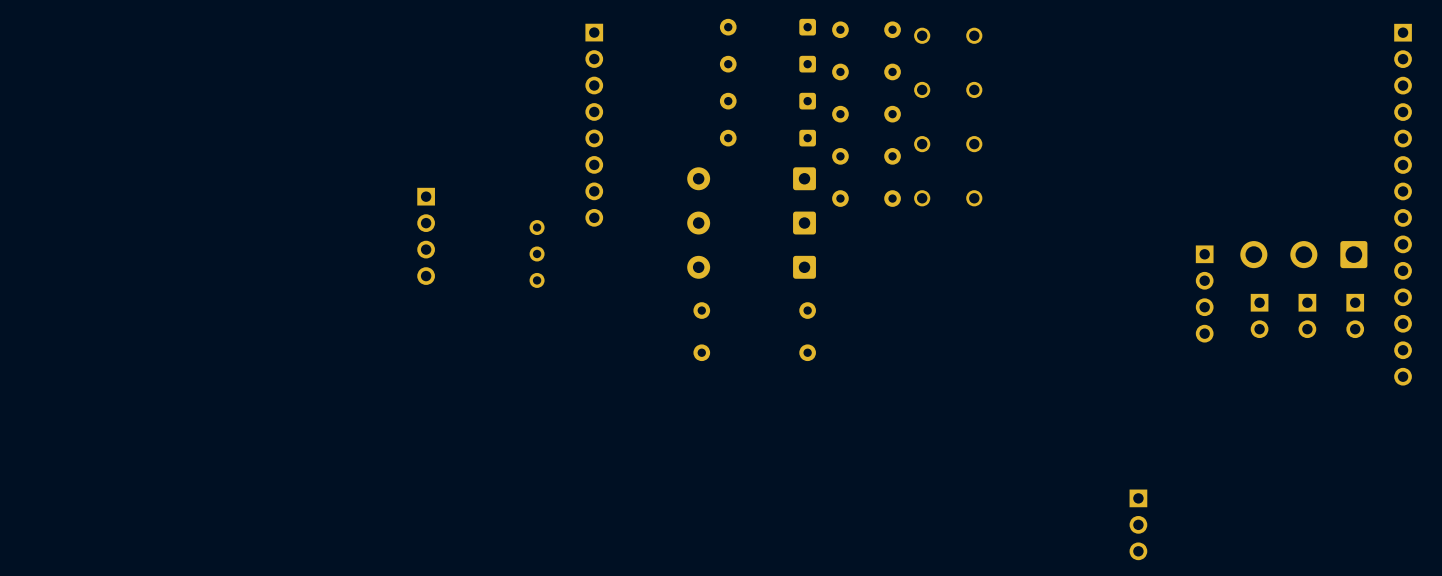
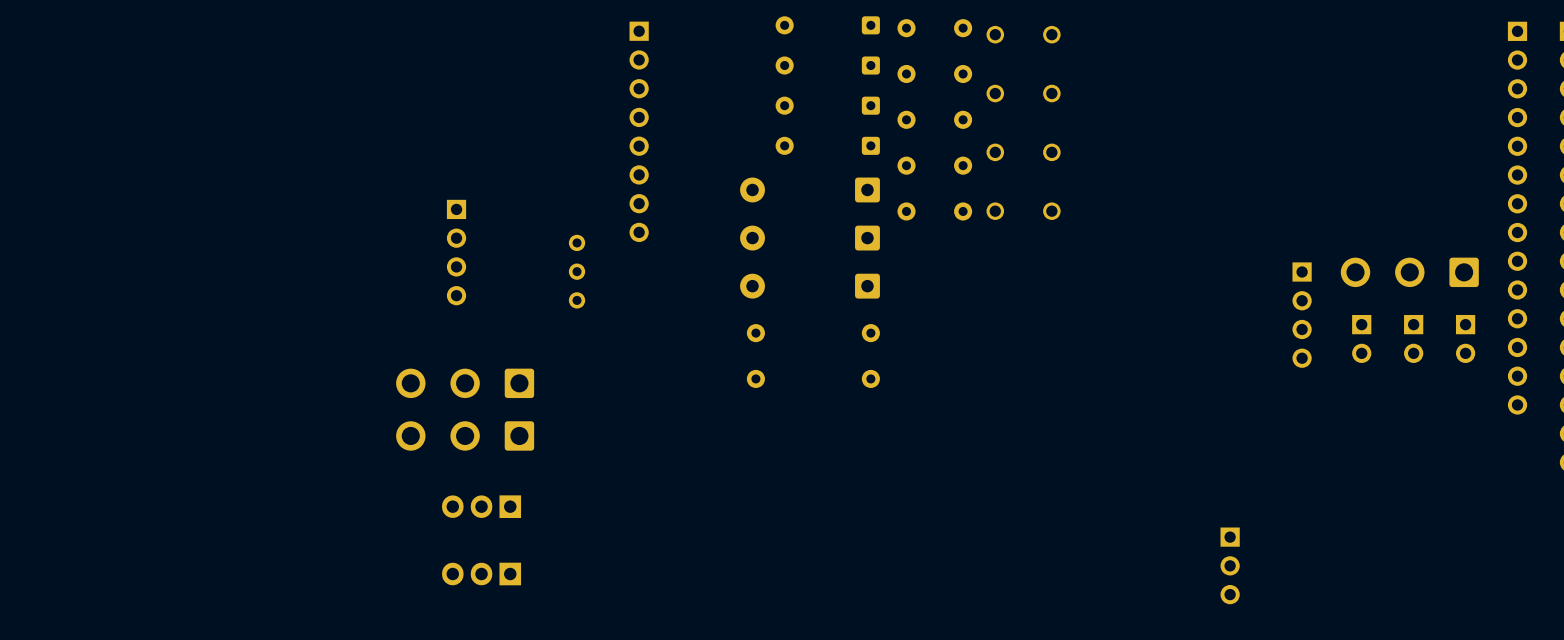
part: none -> (465, 383)
part: none -> (465, 435)
part: none -> (481, 506)
part: none -> (481, 574)

